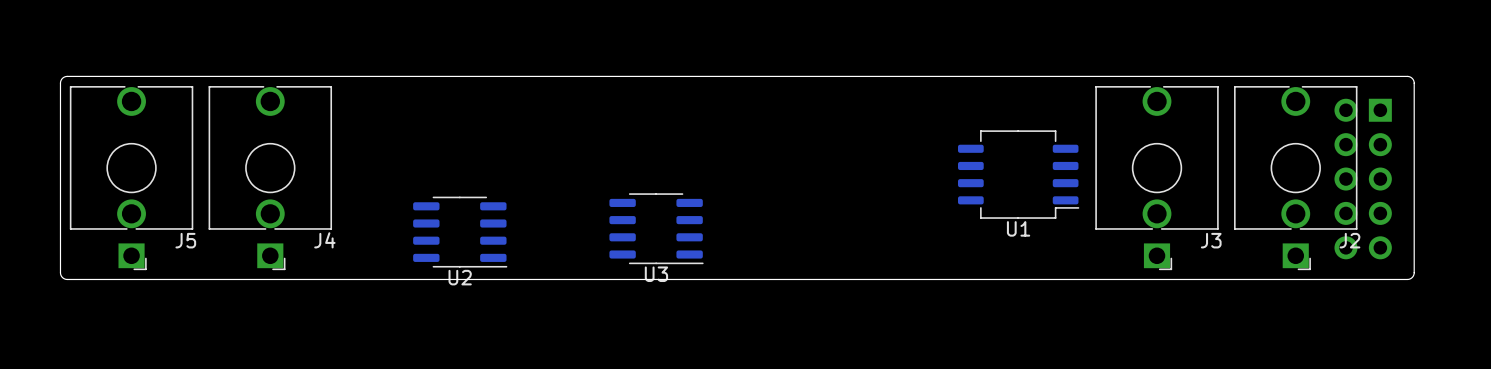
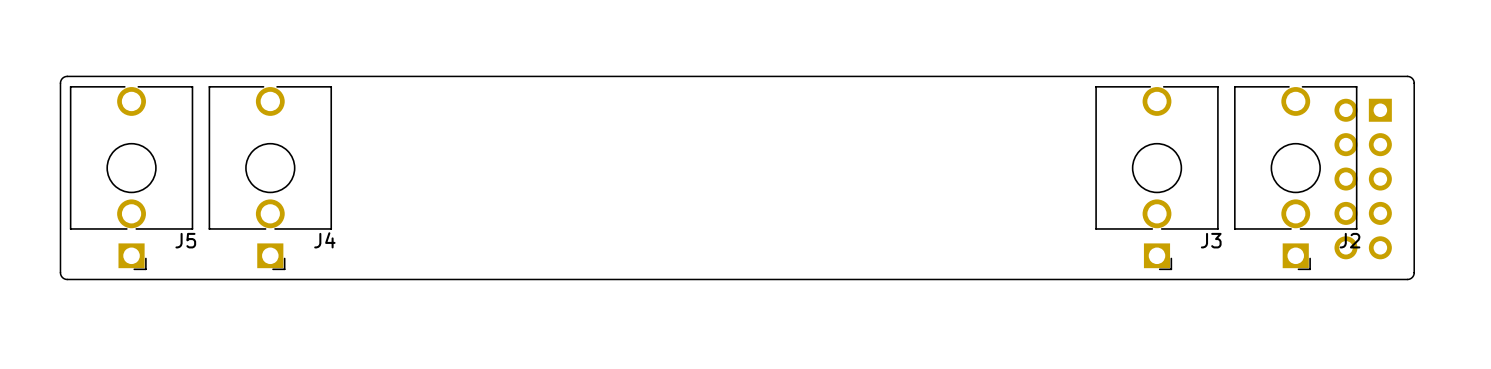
U1: (1018, 174) -> none
U3: (656, 228) -> none
U2: (460, 232) -> none

